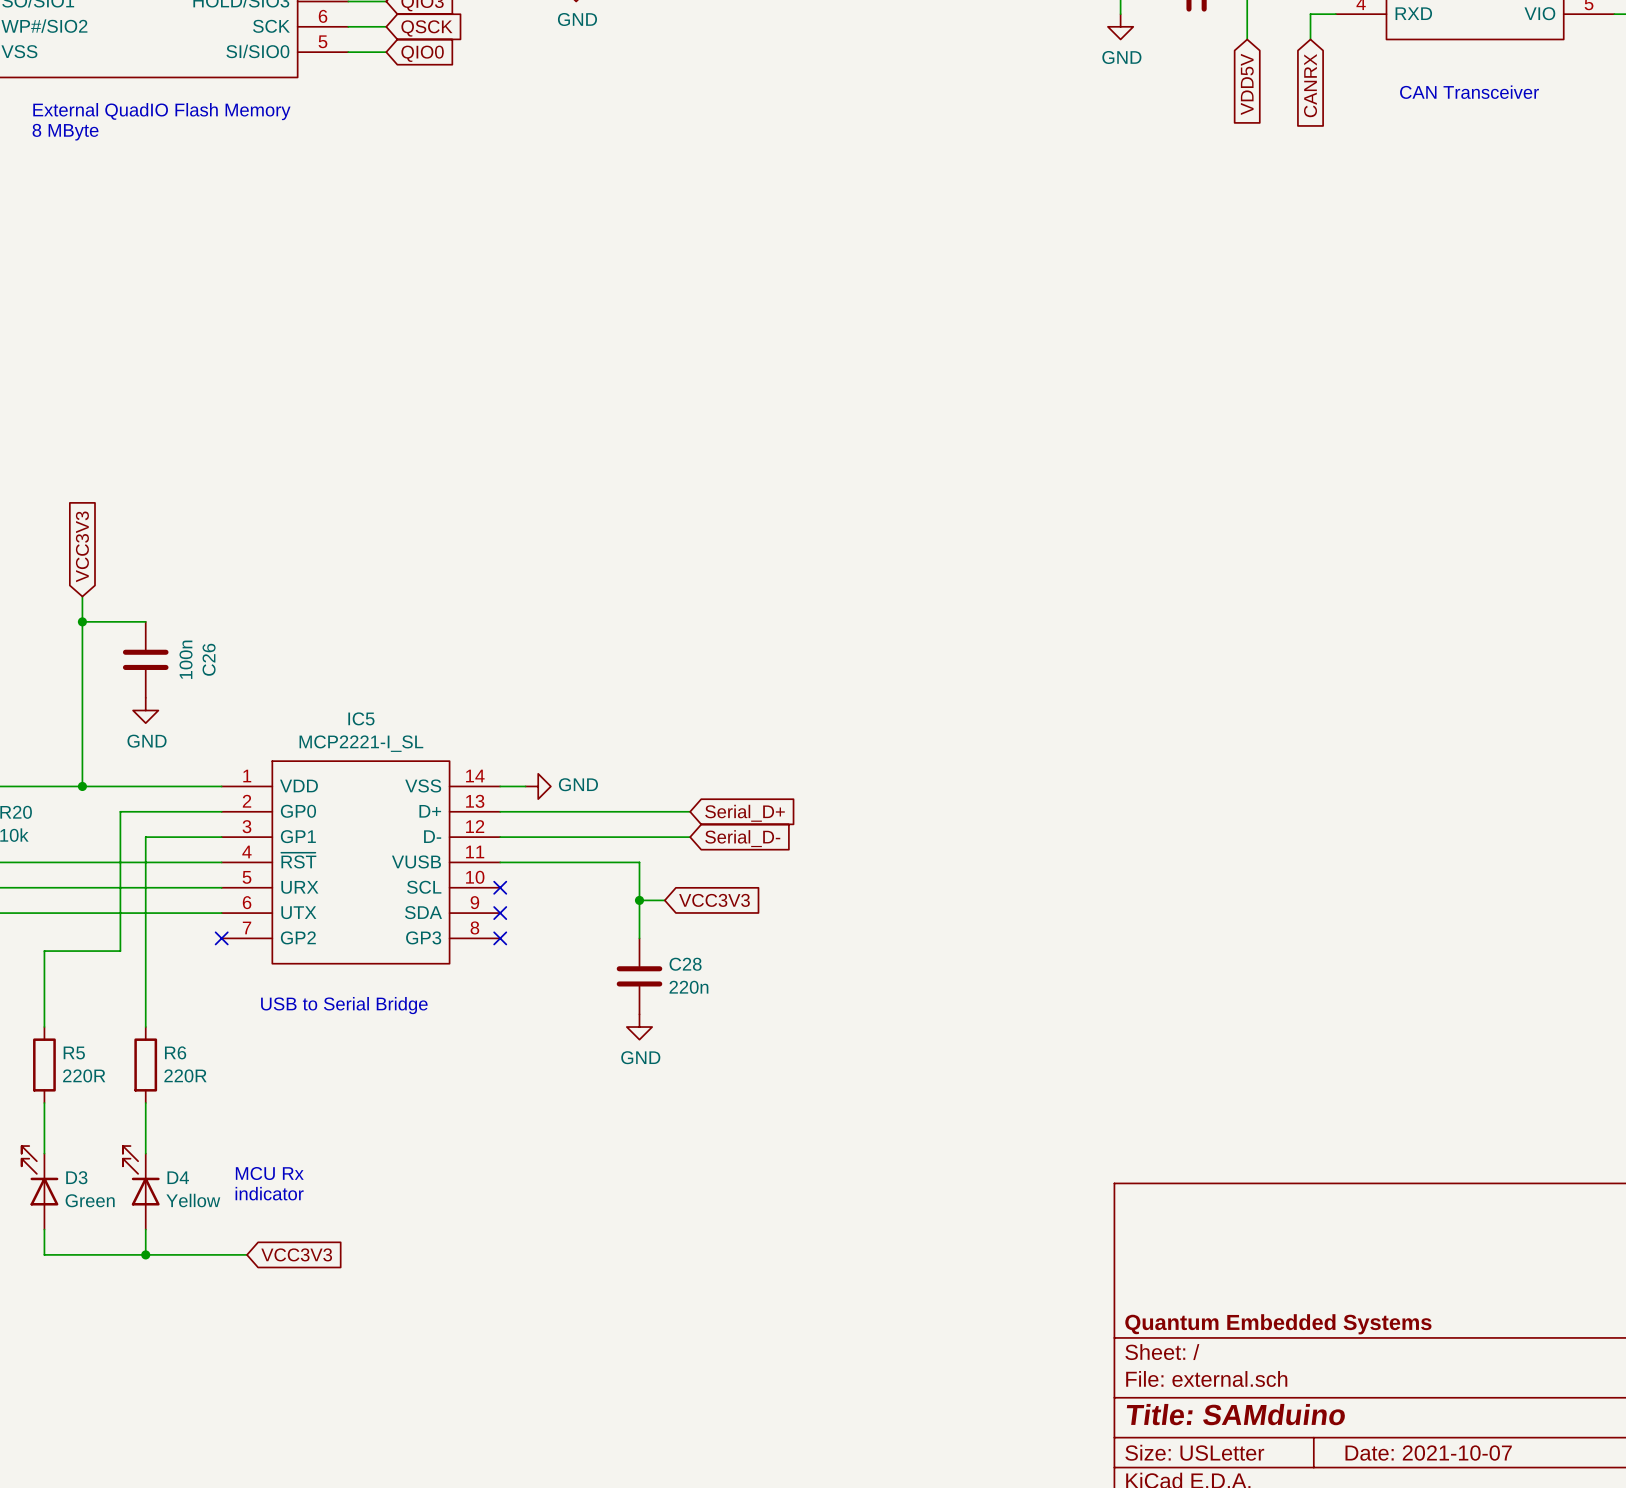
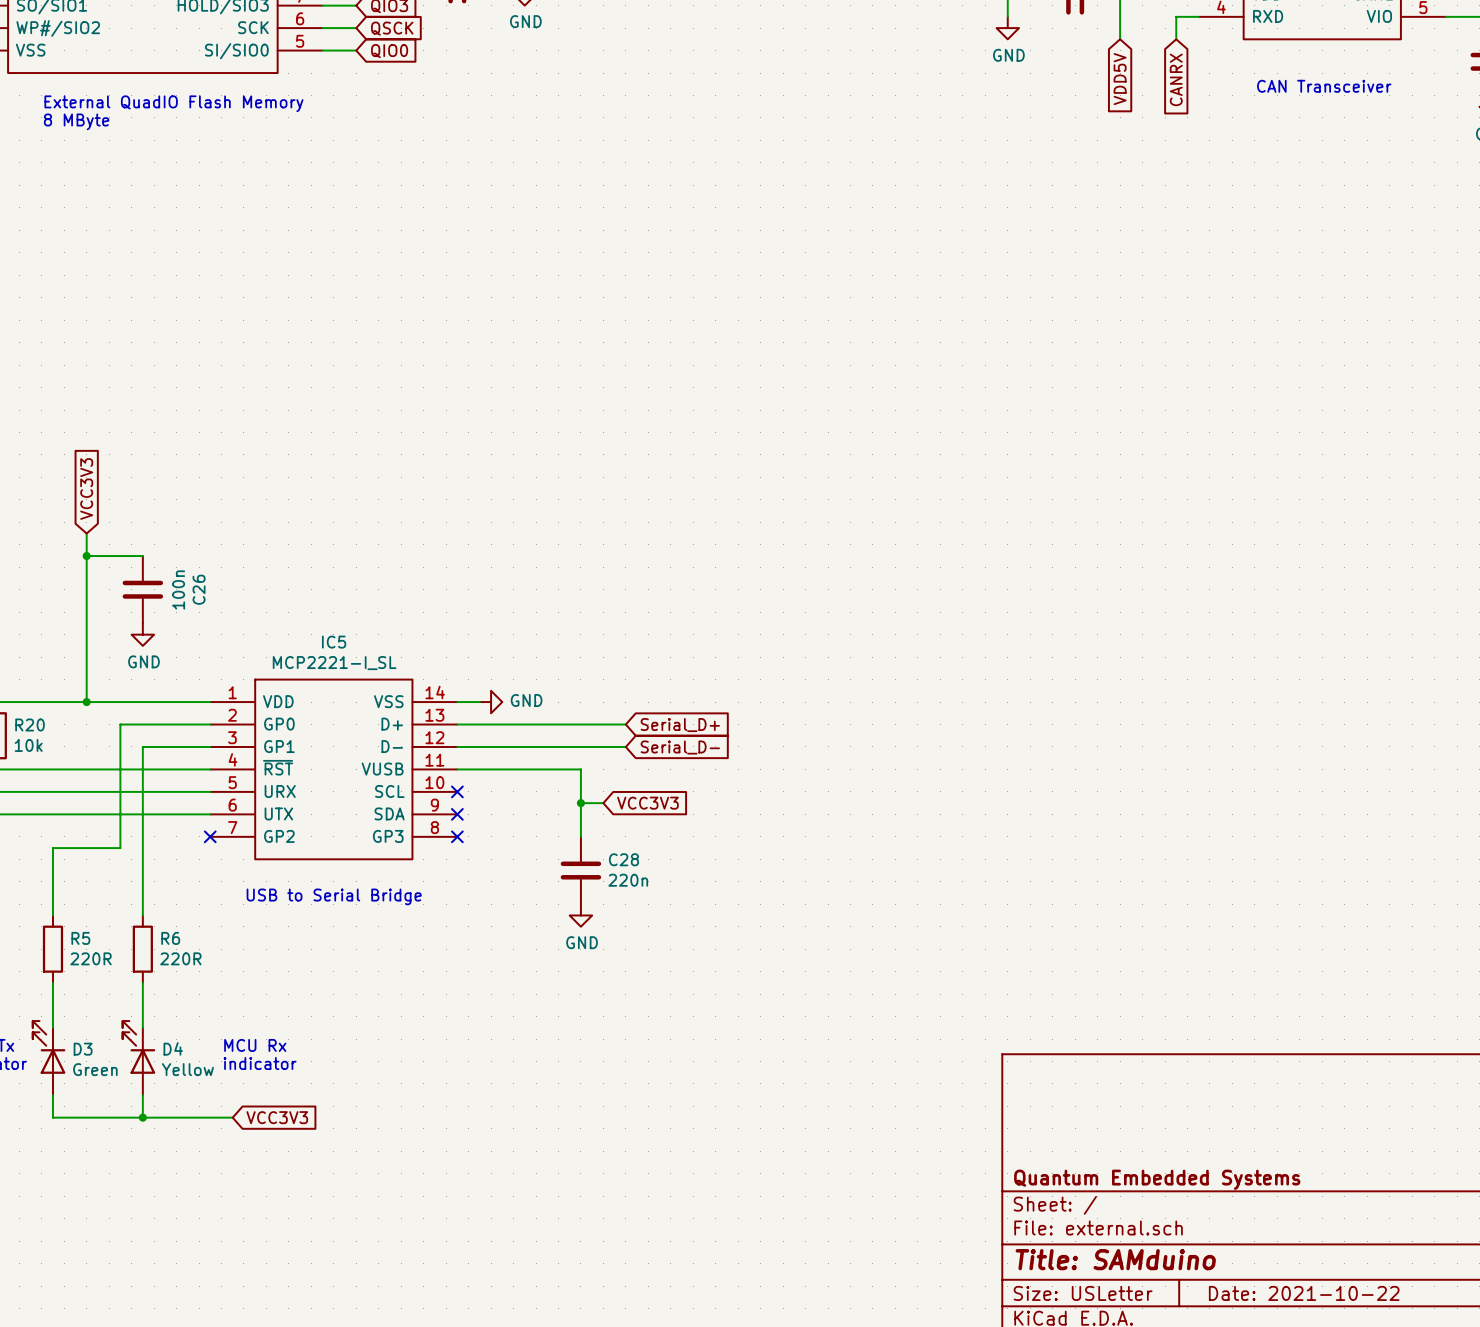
title block: Date: 2021-10-07 (1428, 1453) -> Date: 2021-10-22 (1304, 1293)

